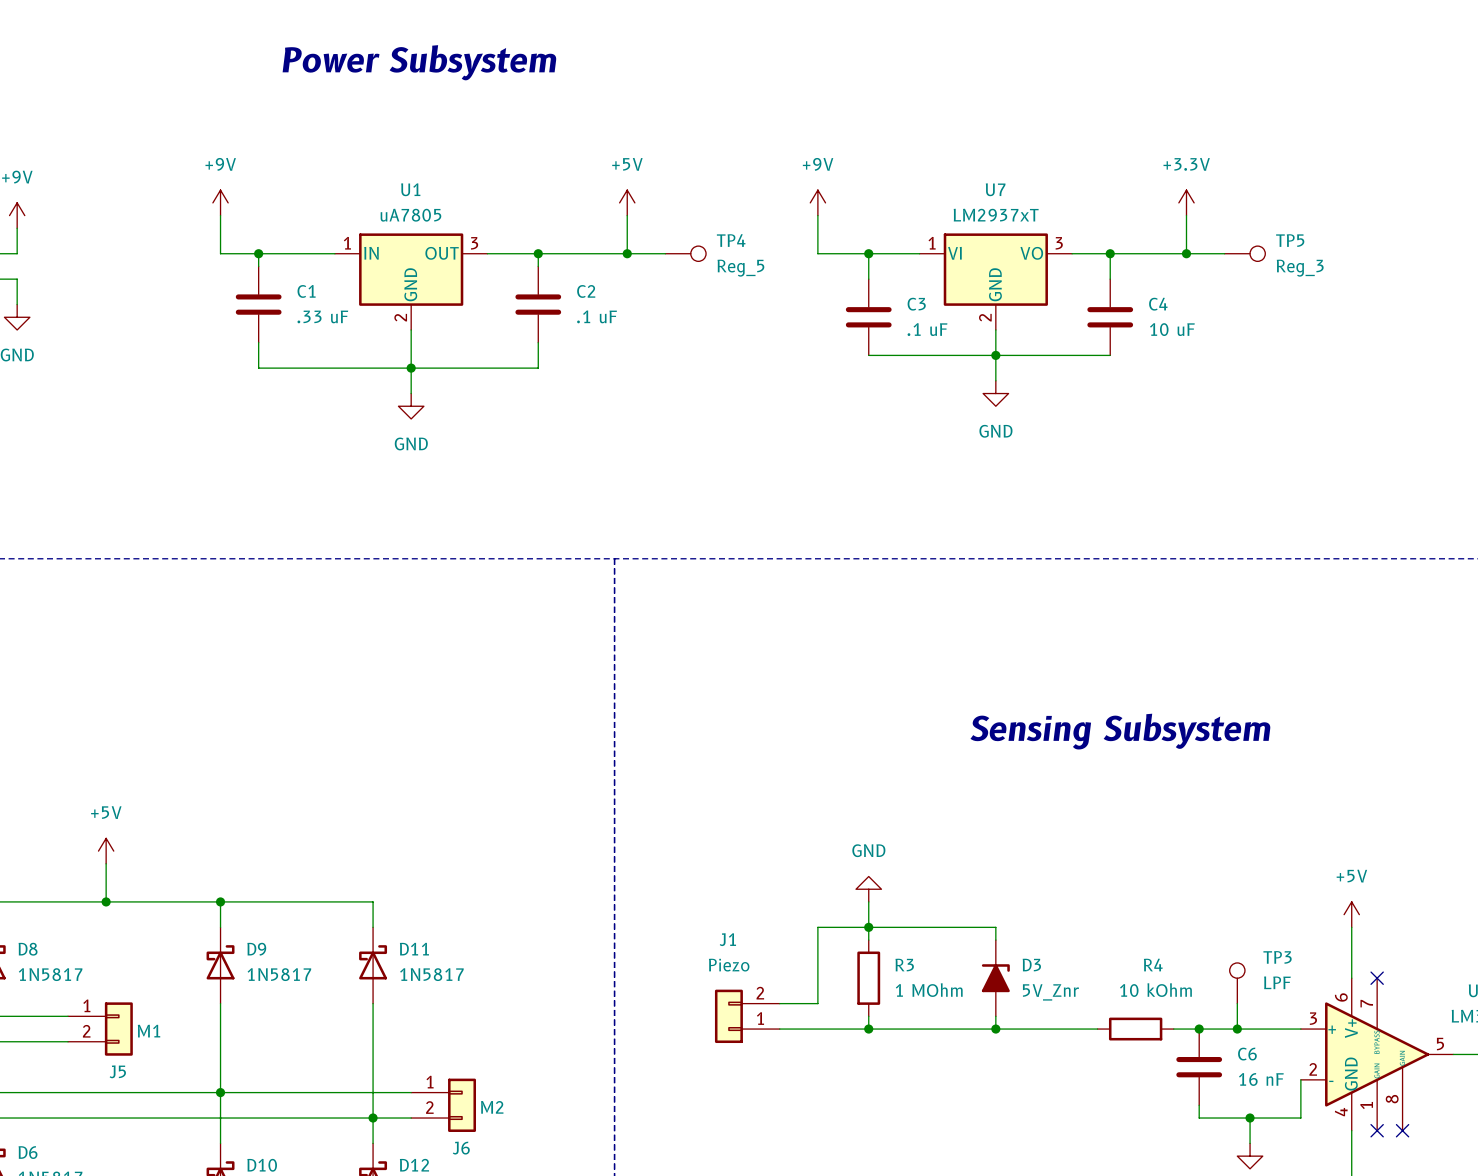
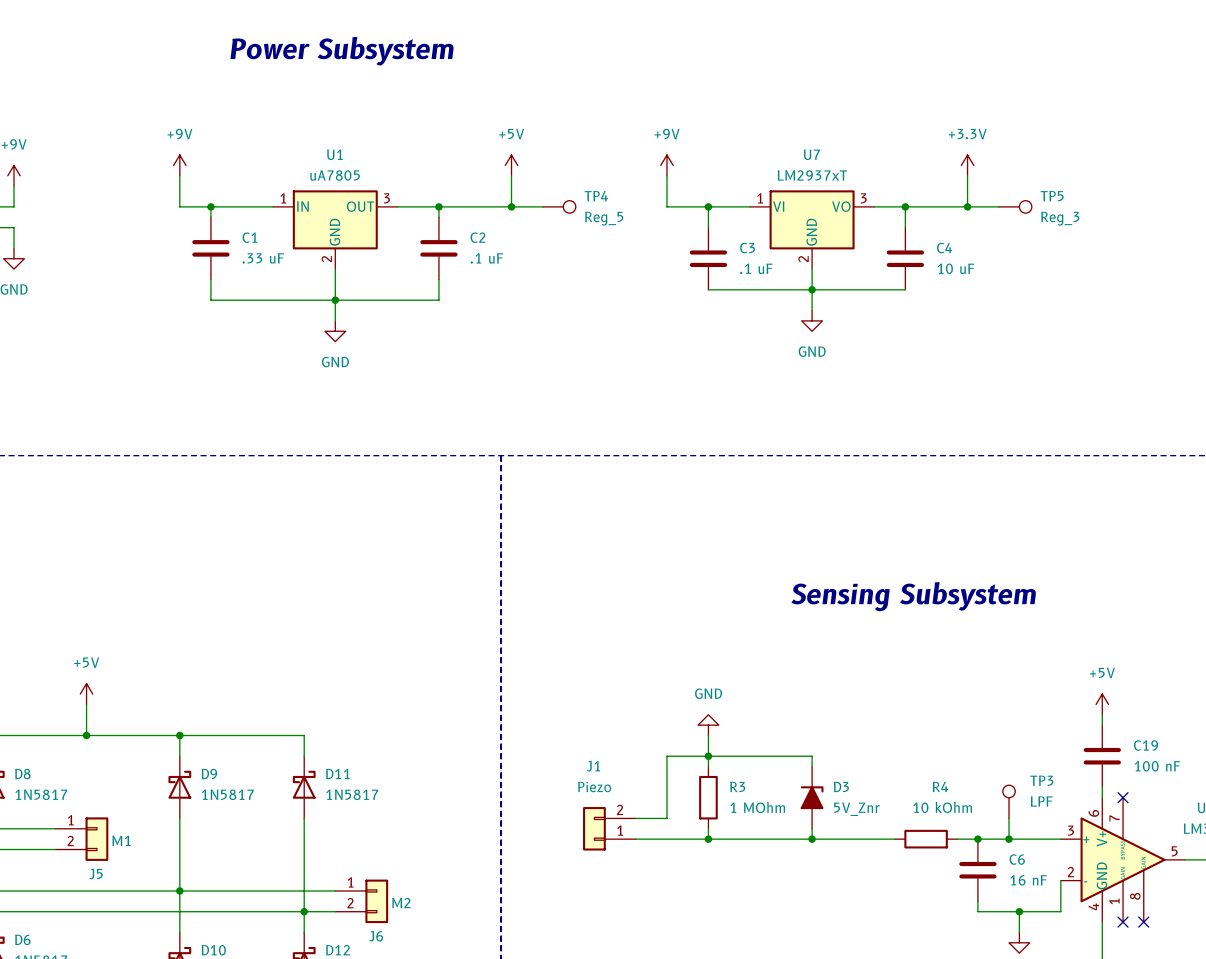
wire: none -> (1102, 714) (1102, 725)
power symbol position: +5V (1351, 914) -> +5V (1102, 704)
C19: none -> 100 nF (1102, 756)

